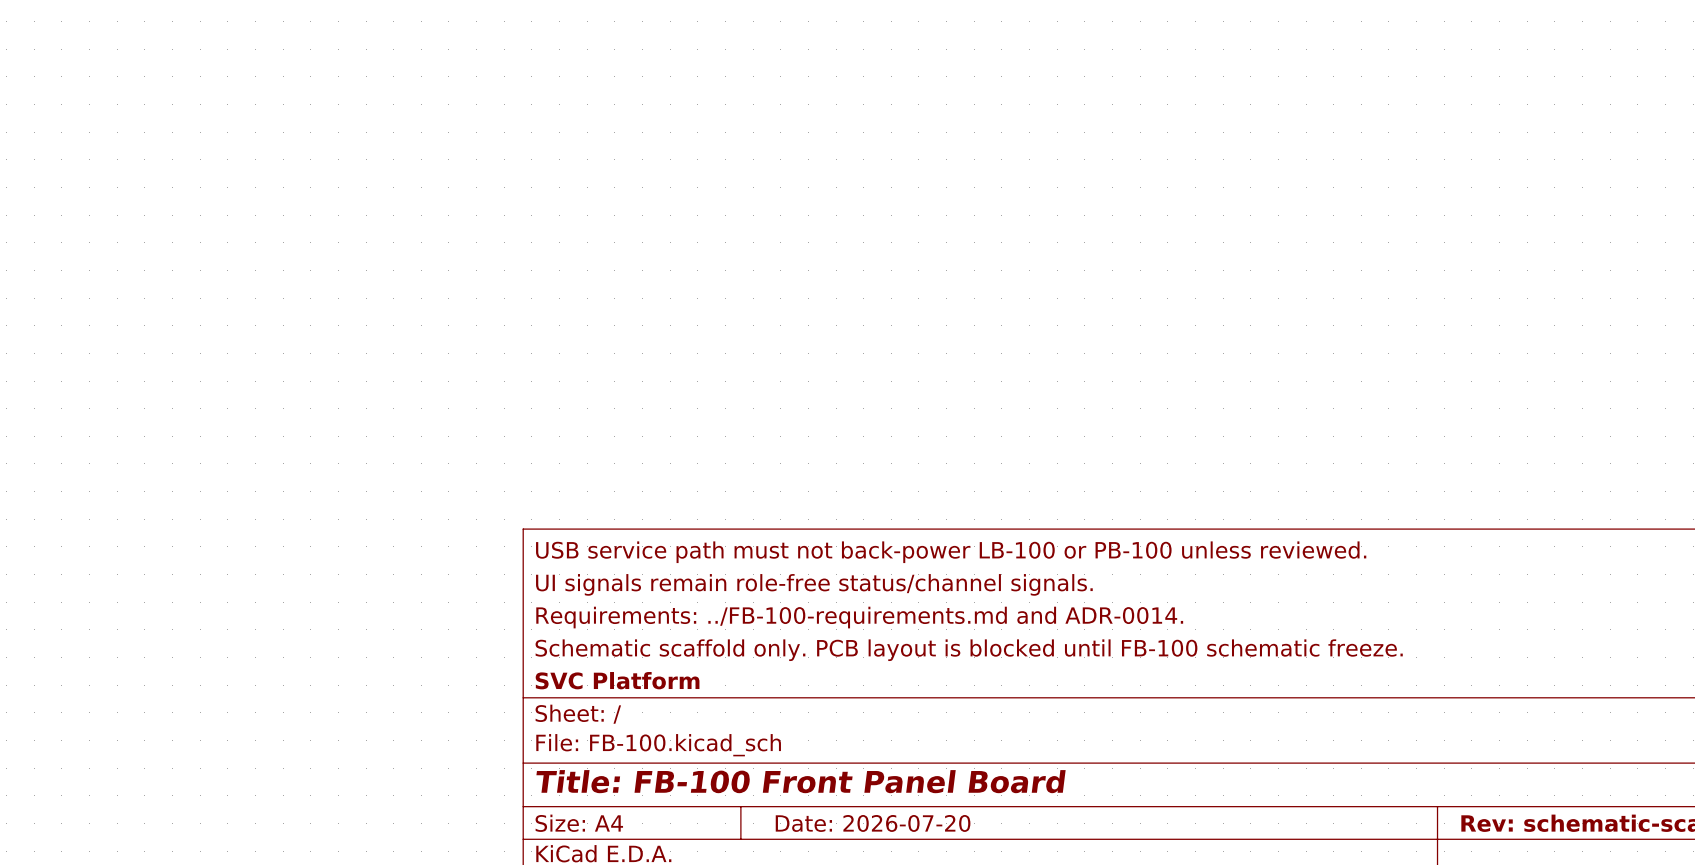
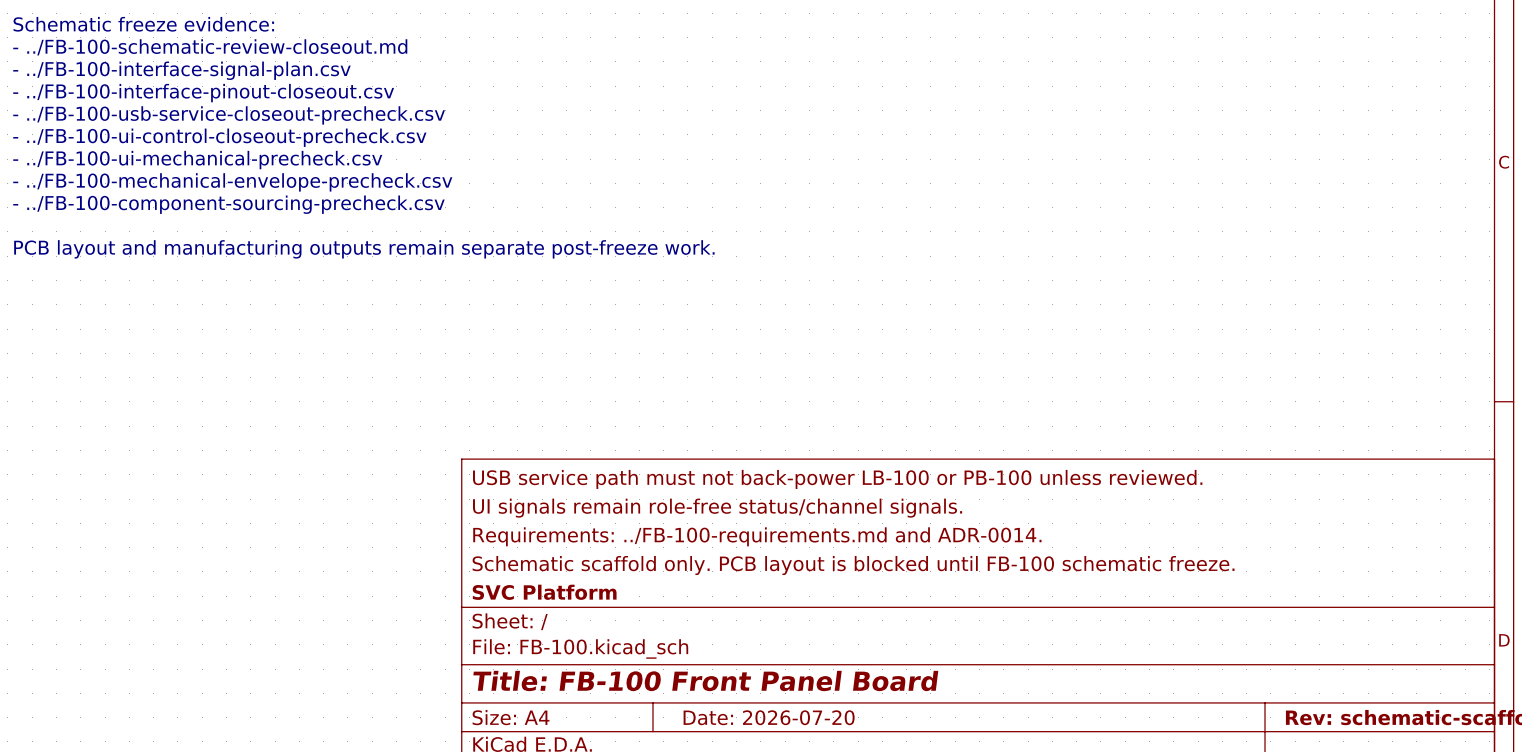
text: none -> Schematic freeze evidence: (143, 24)
text: none -> - ../FB-100-schematic-review-closeout.md (210, 47)
text: none -> - ../FB-100-interface-signal-plan.csv (181, 70)
text: none -> - ../FB-100-interface-pinout-closeout.csv (203, 93)
text: none -> - ../FB-100-usb-service-closeout-precheck.csv (229, 115)
text: none -> - ../FB-100-ui-control-closeout-precheck.csv (219, 137)
text: none -> - ../FB-100-ui-mechanical-precheck.csv (197, 160)
text: none -> - ../FB-100-mechanical-envelope-precheck.csv (232, 182)
text: none -> - ../FB-100-component-sourcing-precheck.csv (228, 204)
text: none -> PCB layout and manufacturing outputs remain separate post-freeze work. (364, 249)

